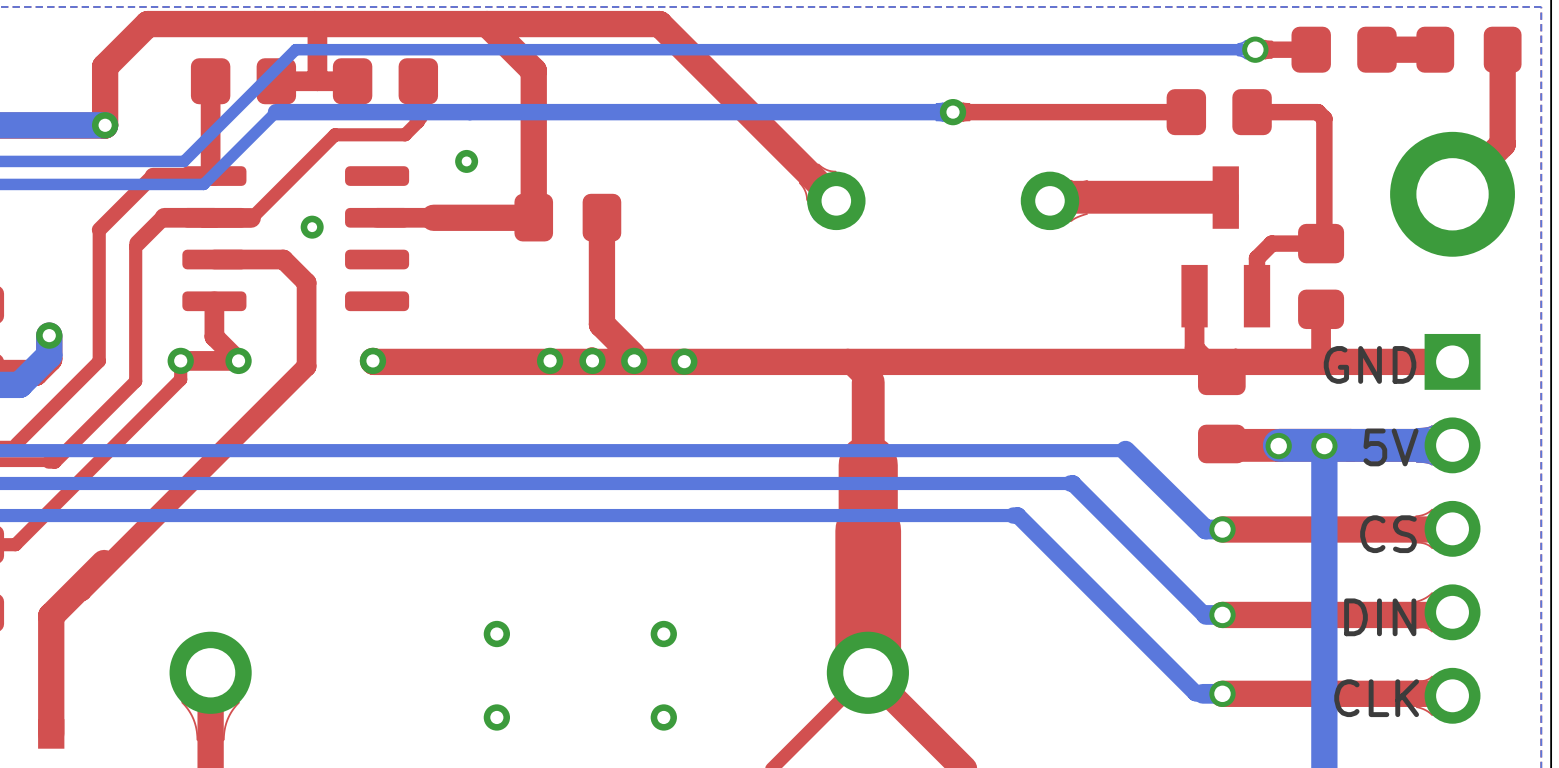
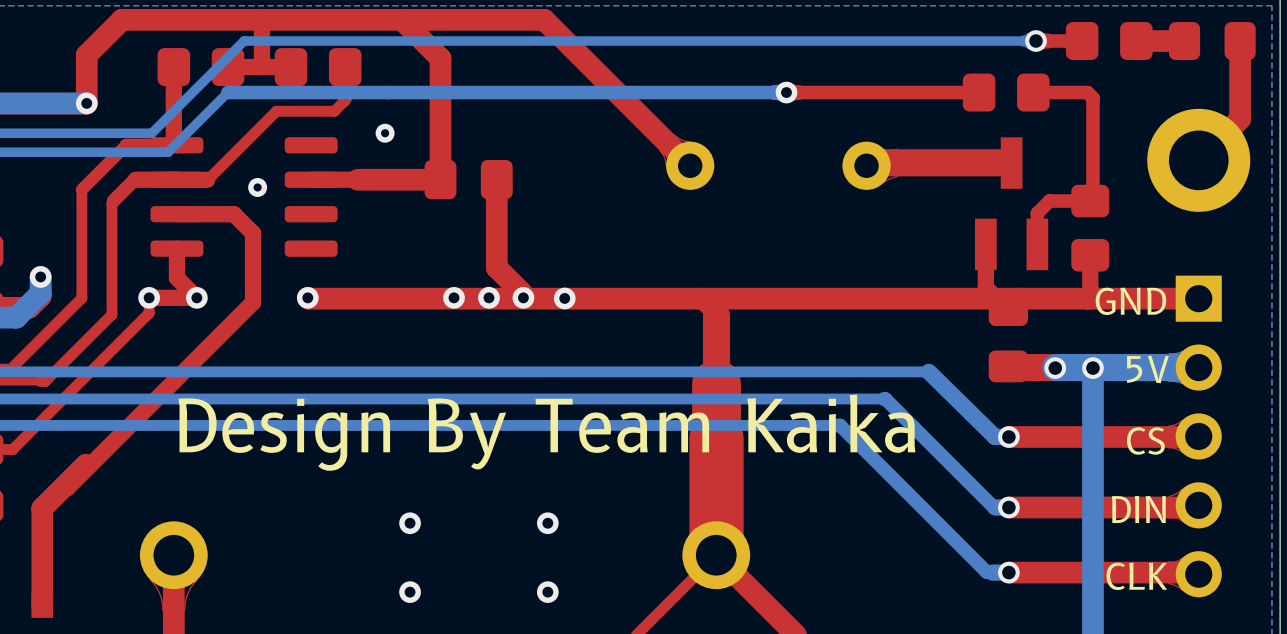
text: none -> Design By Team Kaika (546, 432)

